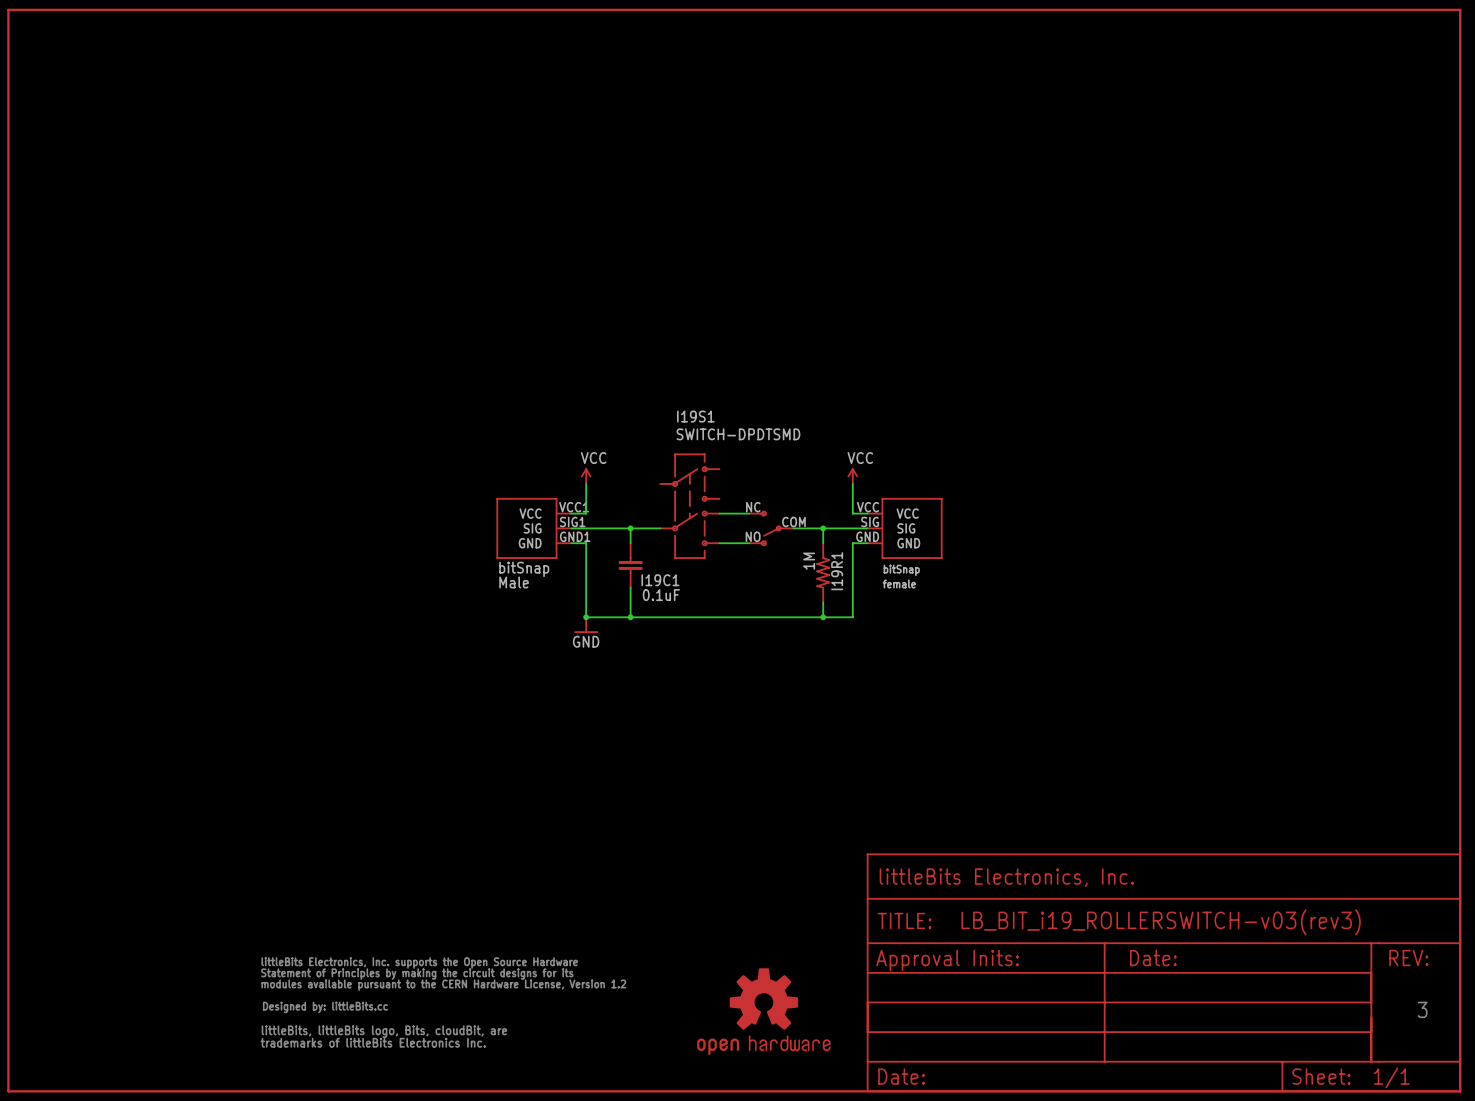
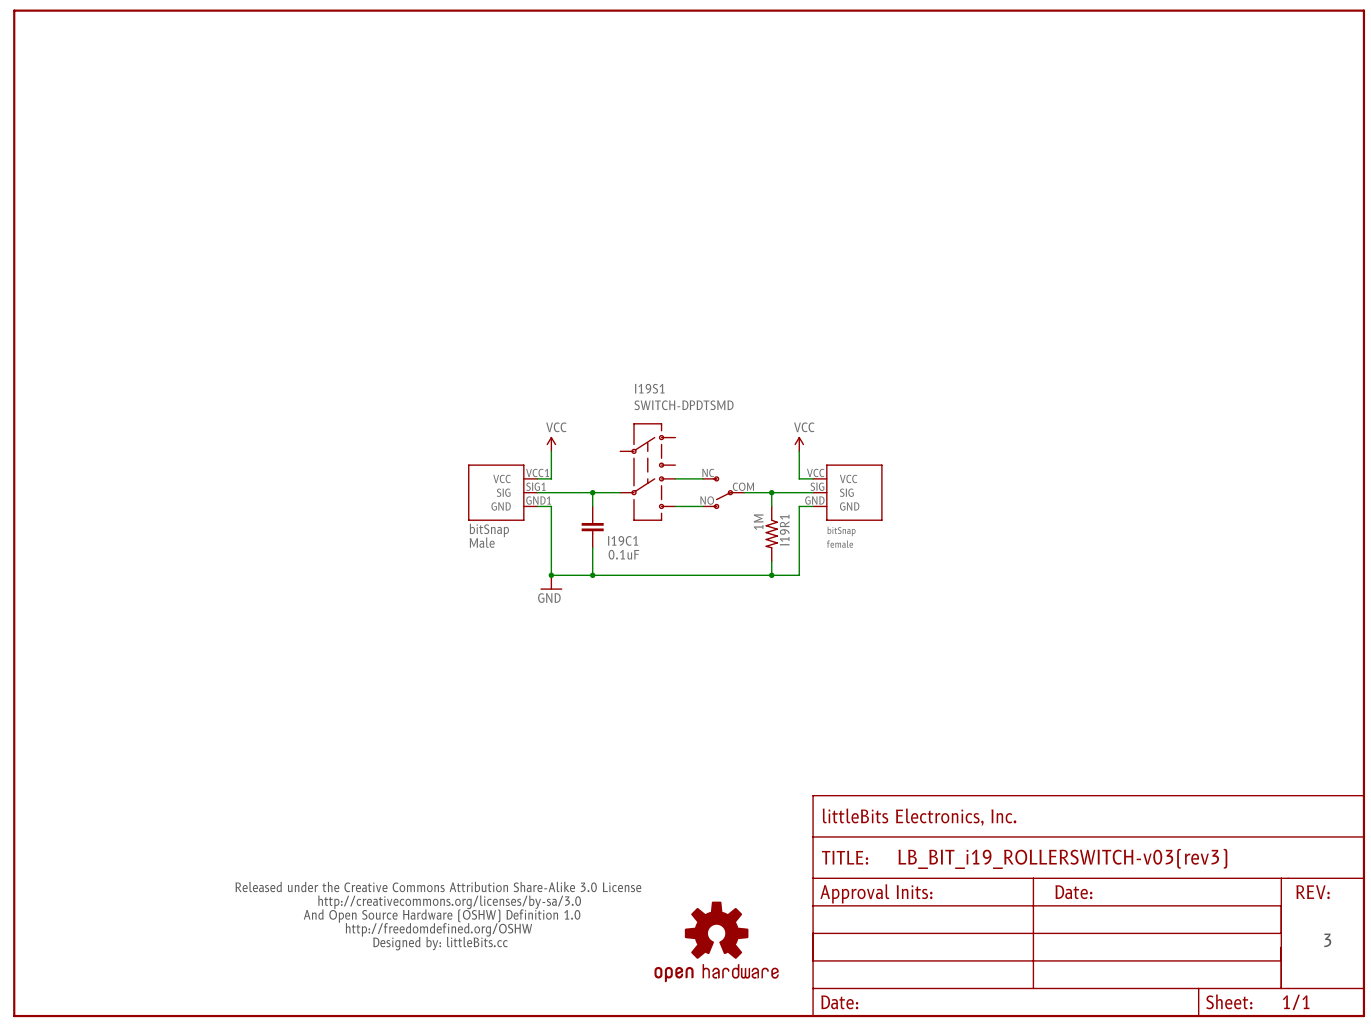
part: none -> (438, 916)
part: (443, 1002) -> none

